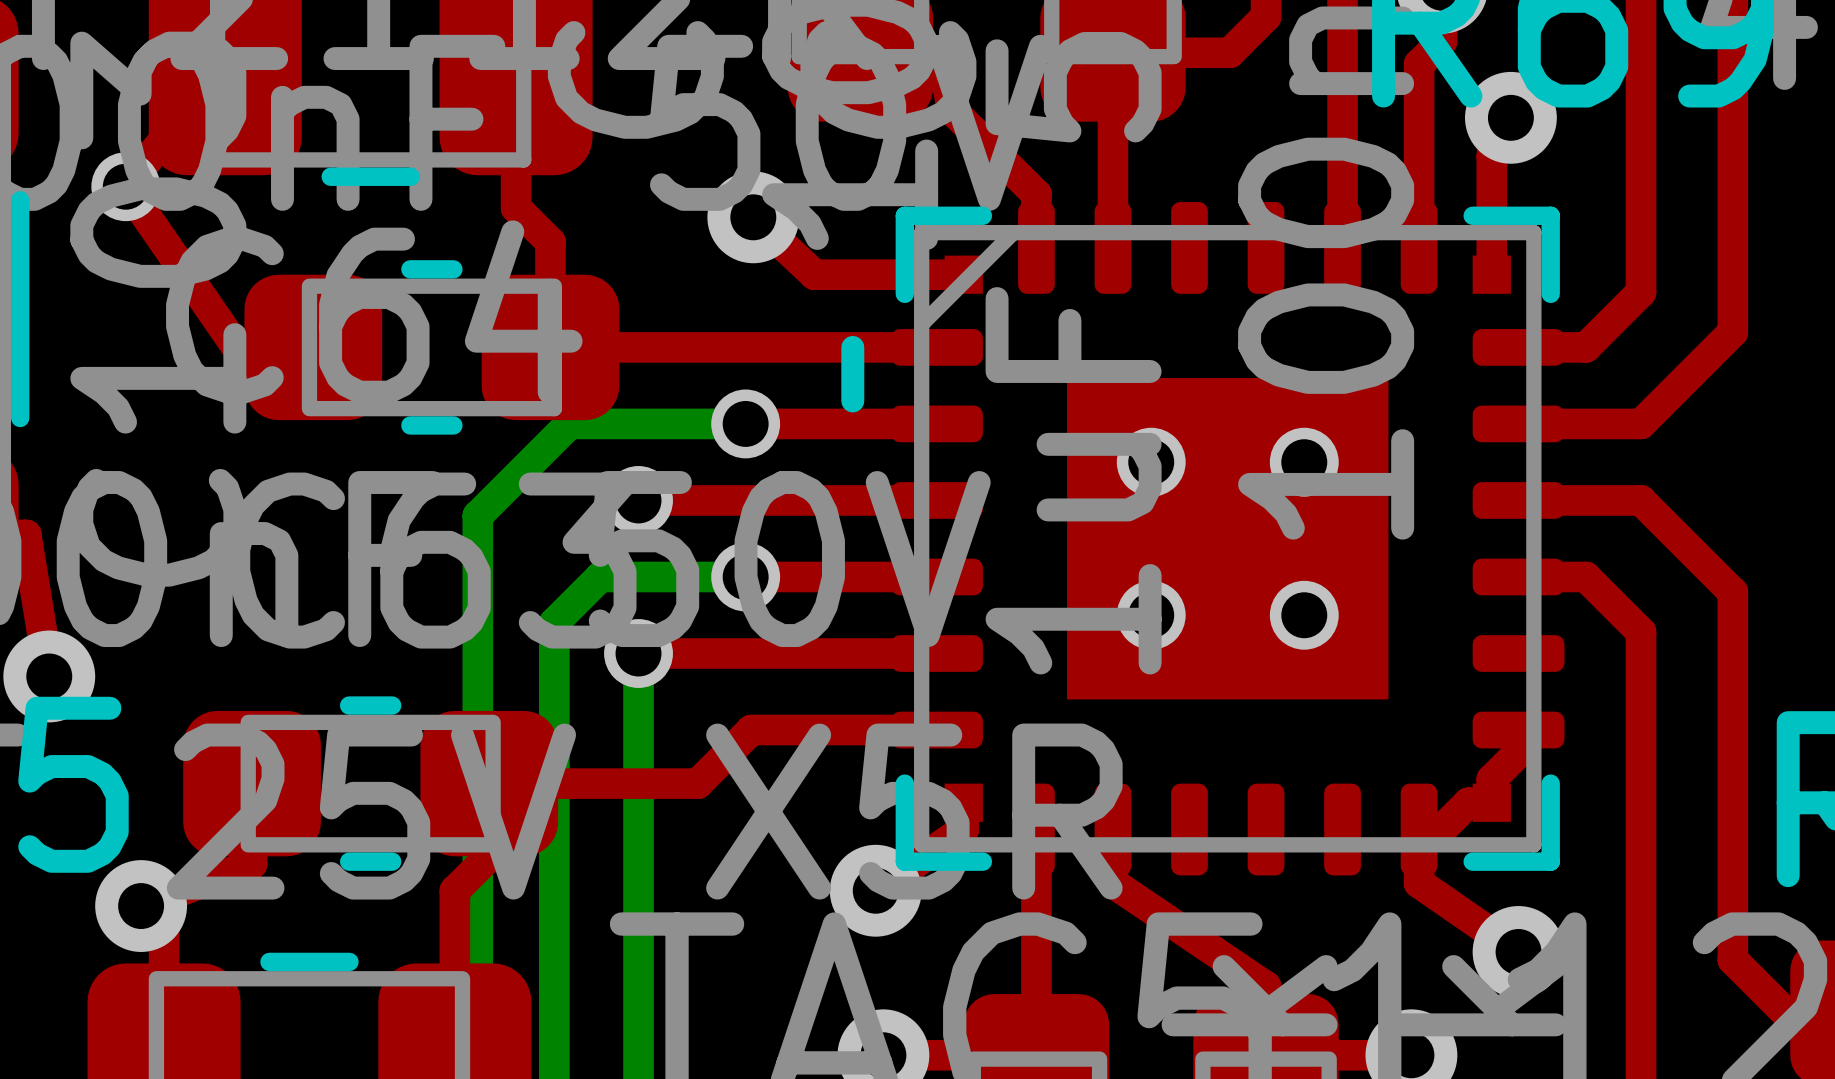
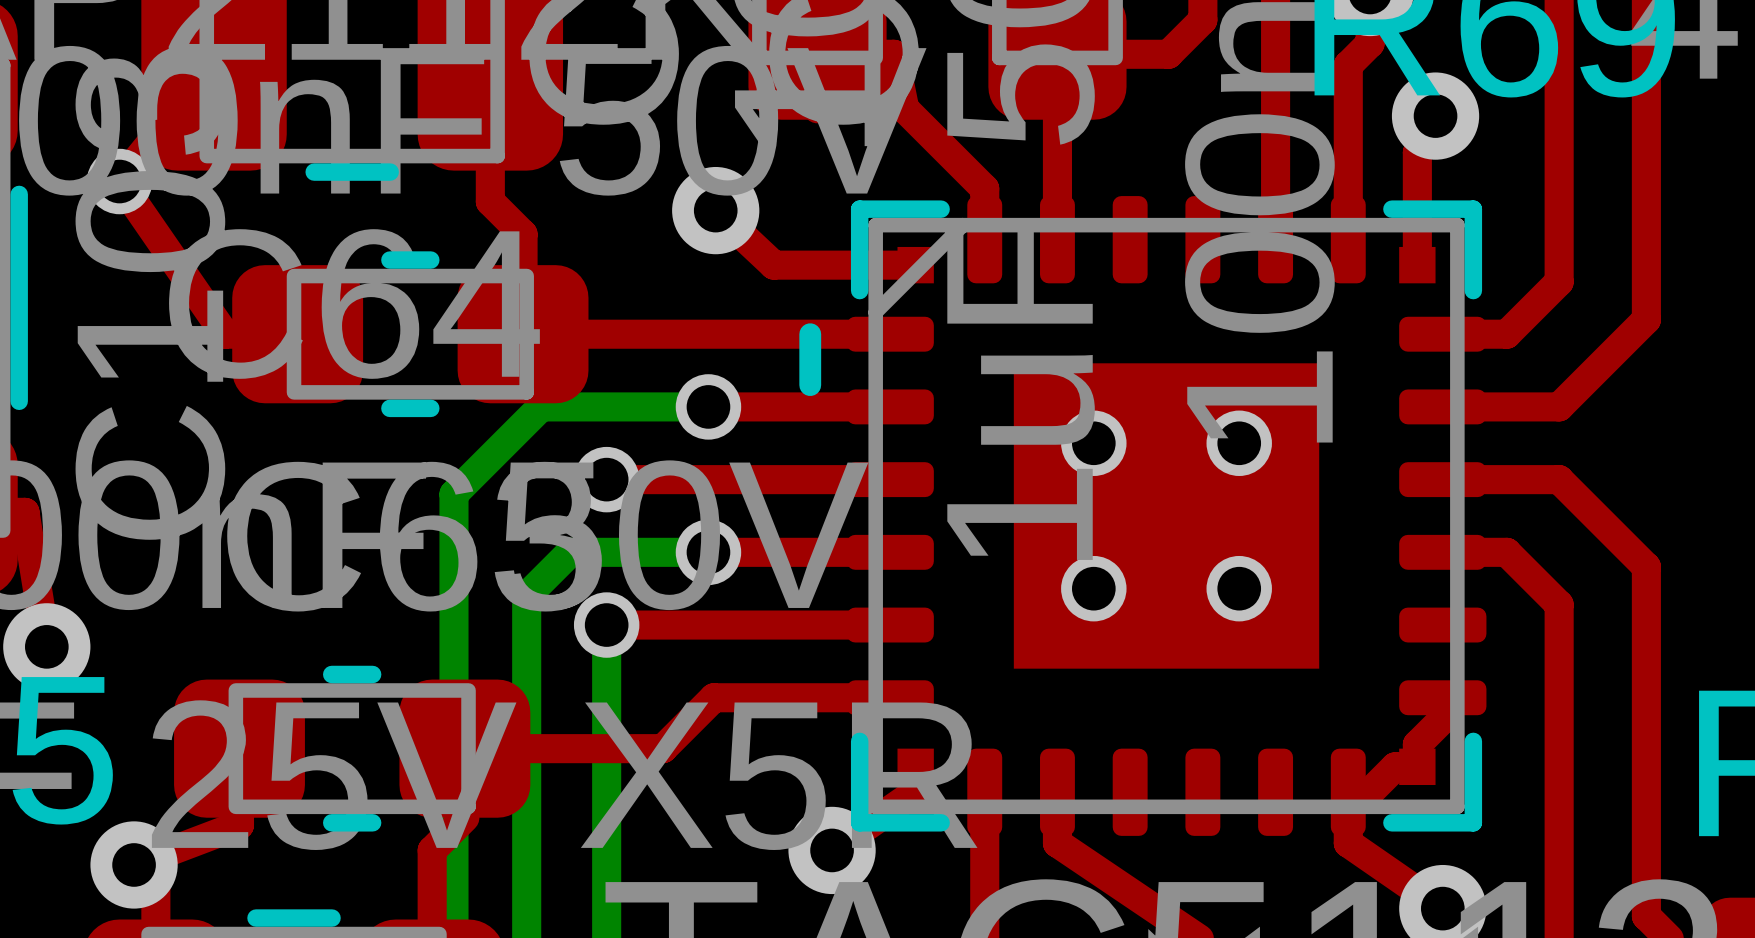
part footprint: [841, 202, 1565, 876] -> [799, 196, 1487, 836]

